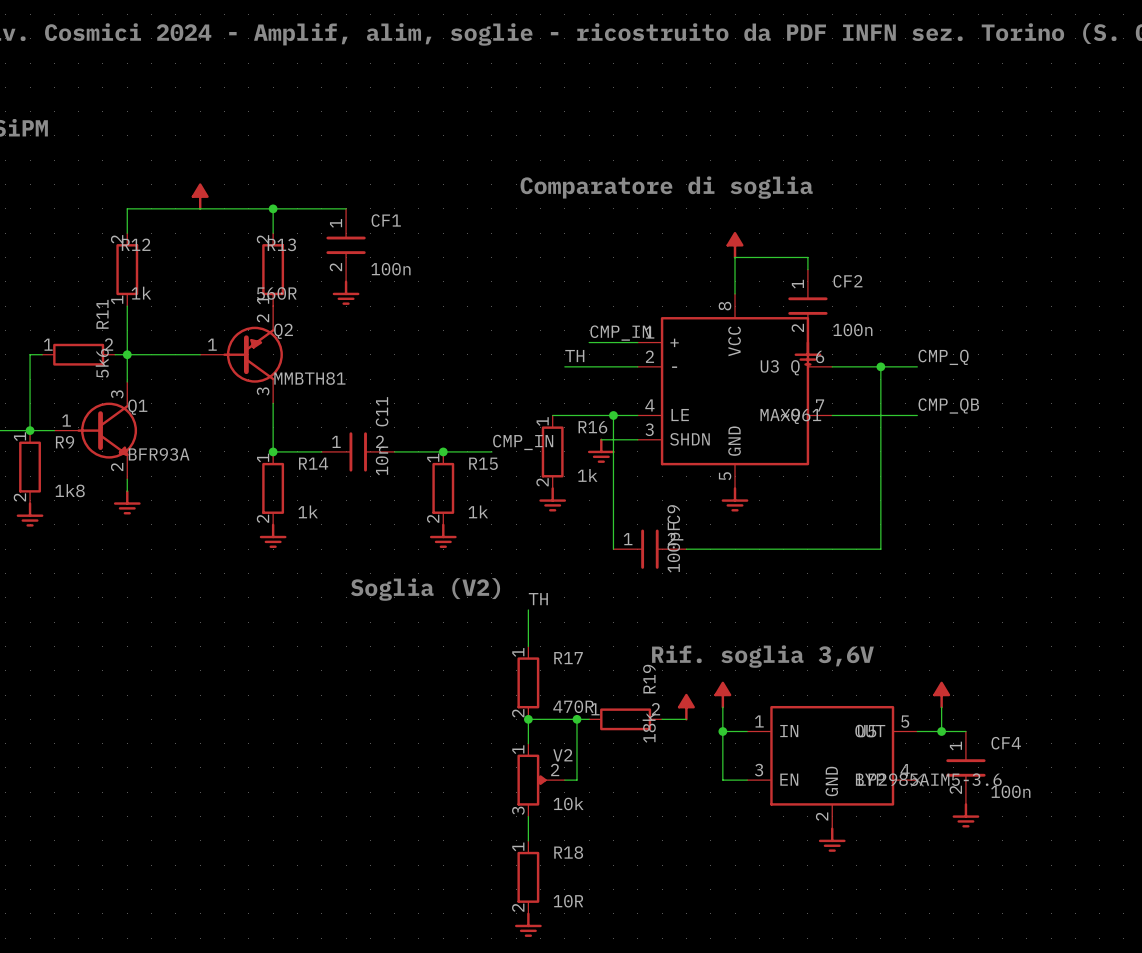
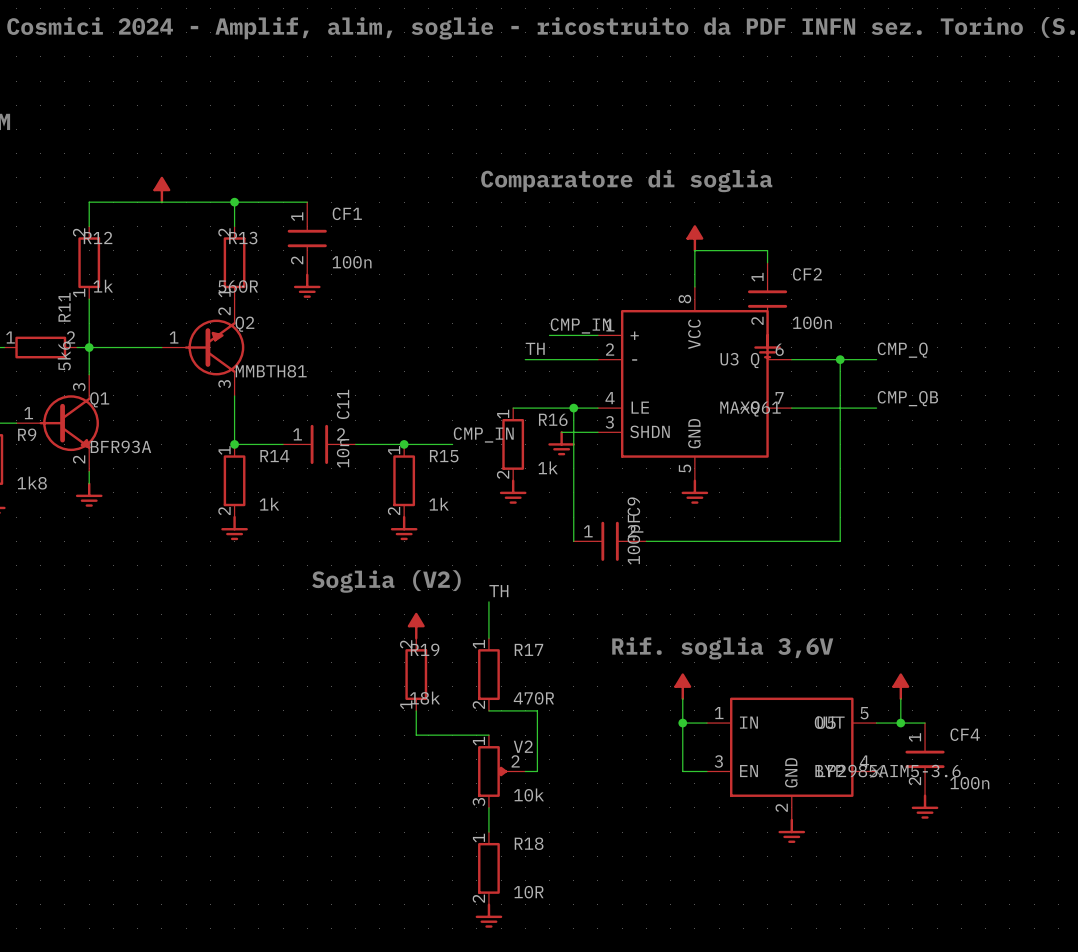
power symbol: none -> (416, 626)
R19 name position: R19 (649, 679) -> R19 (425, 649)
power symbol: (686, 707) -> none
wire: (528, 719) (528, 743) -> (416, 710) (416, 735) (488, 735)
junction: (528, 719) -> none
wire: (576, 719) (589, 719) -> none
junction: (576, 719) -> none
R19 rotation: 0° (625, 719) -> 90° counterclockwise (416, 674)
R19 position: (625, 719) -> (416, 674)
wire: (662, 719) (686, 719) -> none
R19 value position: 18k (649, 727) -> 18k (425, 698)

